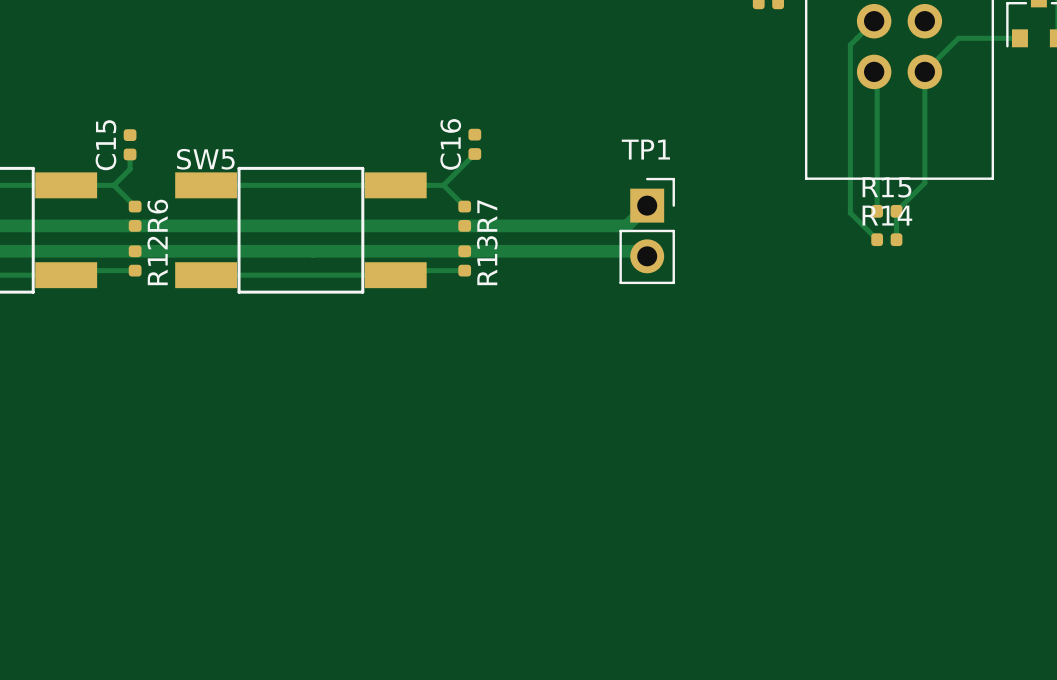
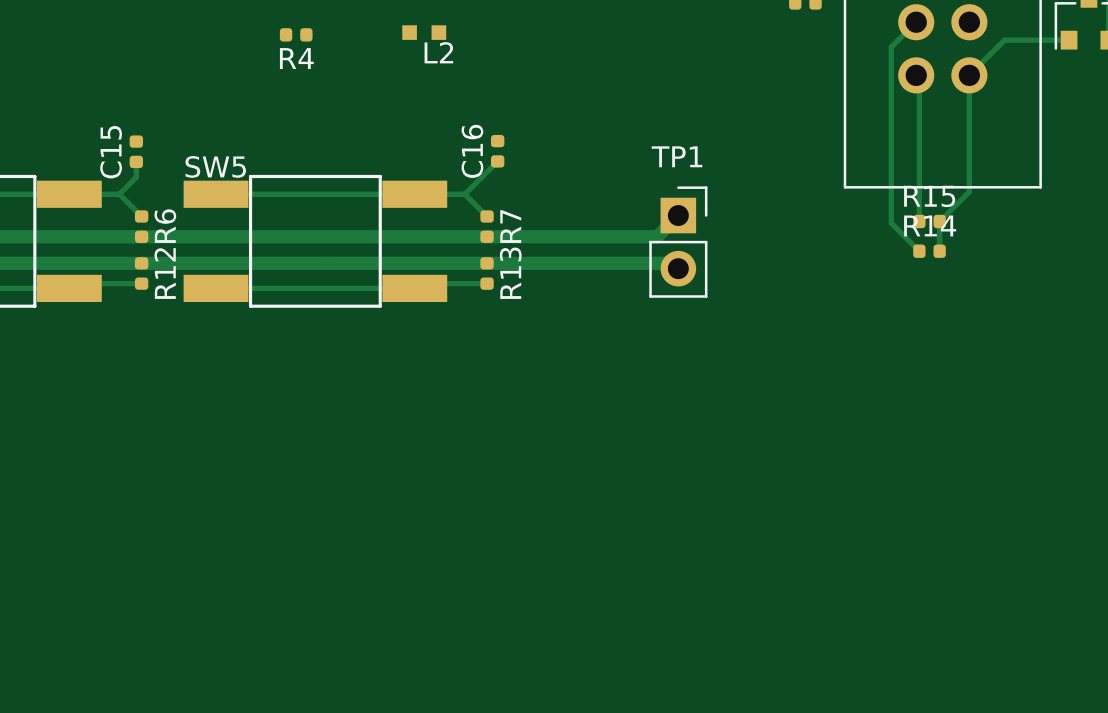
L2: none -> (424, 32)
R4: none -> (296, 34)

